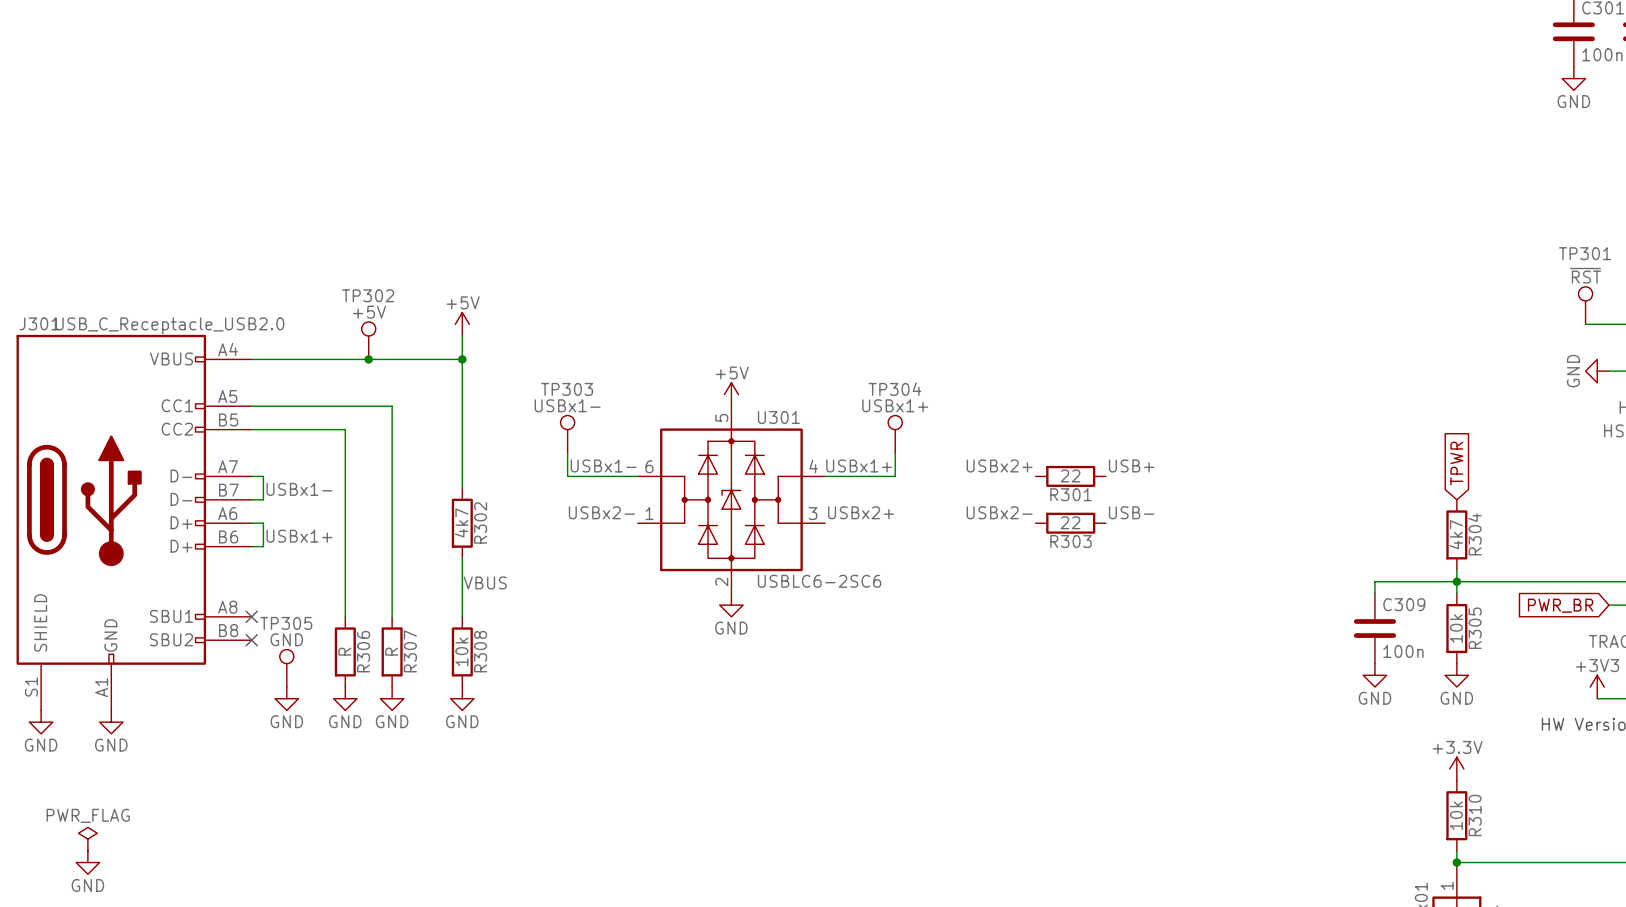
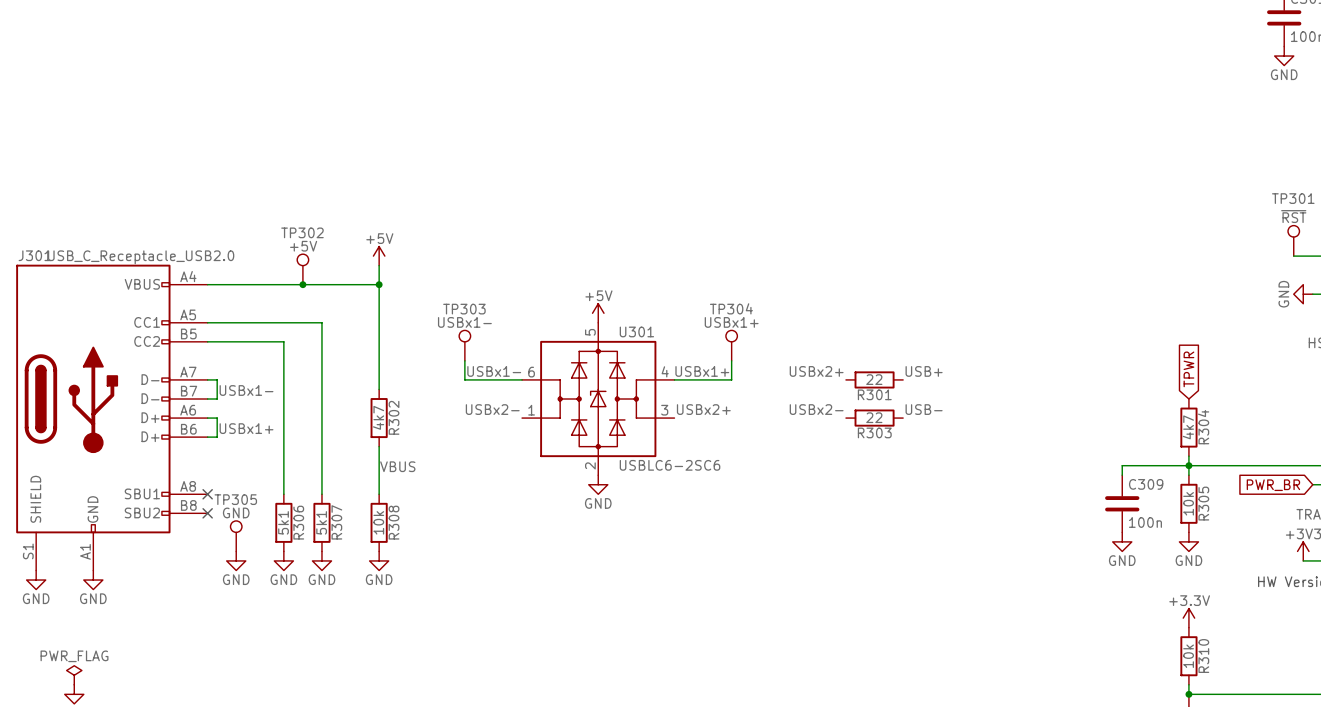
R306 value: R (344, 651) -> 5k1 (283, 522)
R307 value: R (391, 651) -> 5k1 (321, 522)

